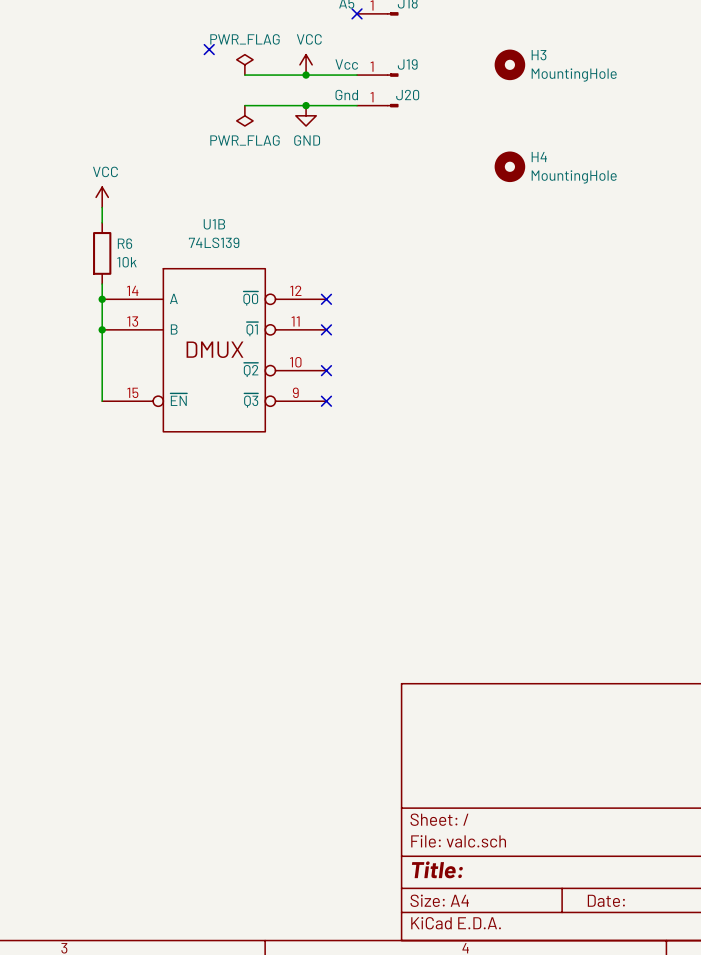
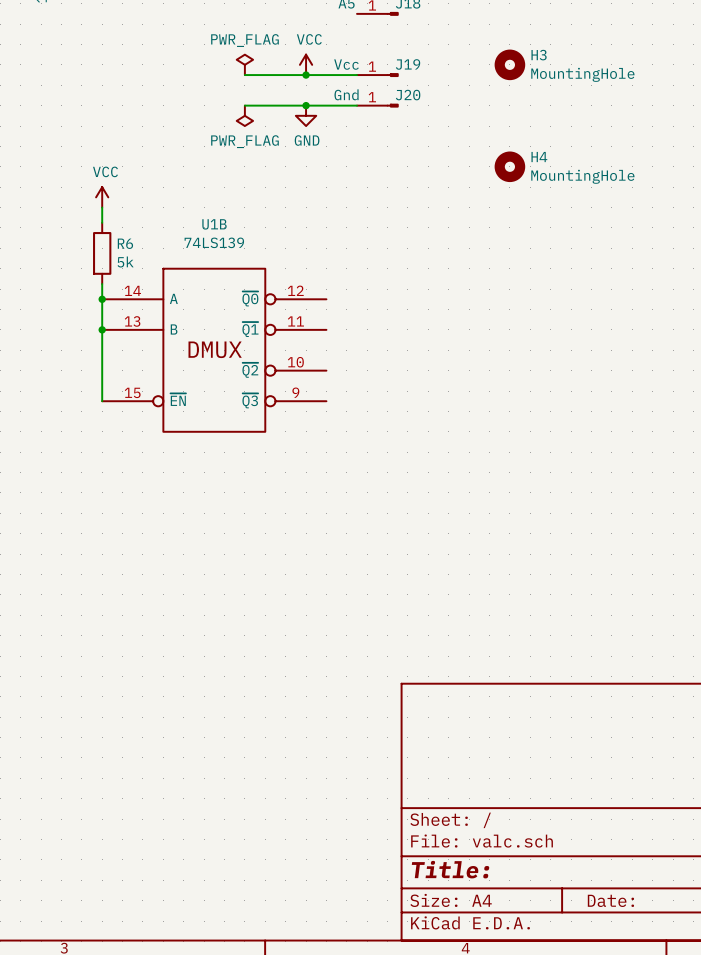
no-connect mark: (357, 13) -> none
no-connect mark: (209, 49) -> none
R6 value: 10k (126, 262) -> 5k (125, 262)
no-connect mark: (326, 299) -> none
no-connect mark: (326, 329) -> none
no-connect mark: (326, 370) -> none
no-connect mark: (326, 401) -> none

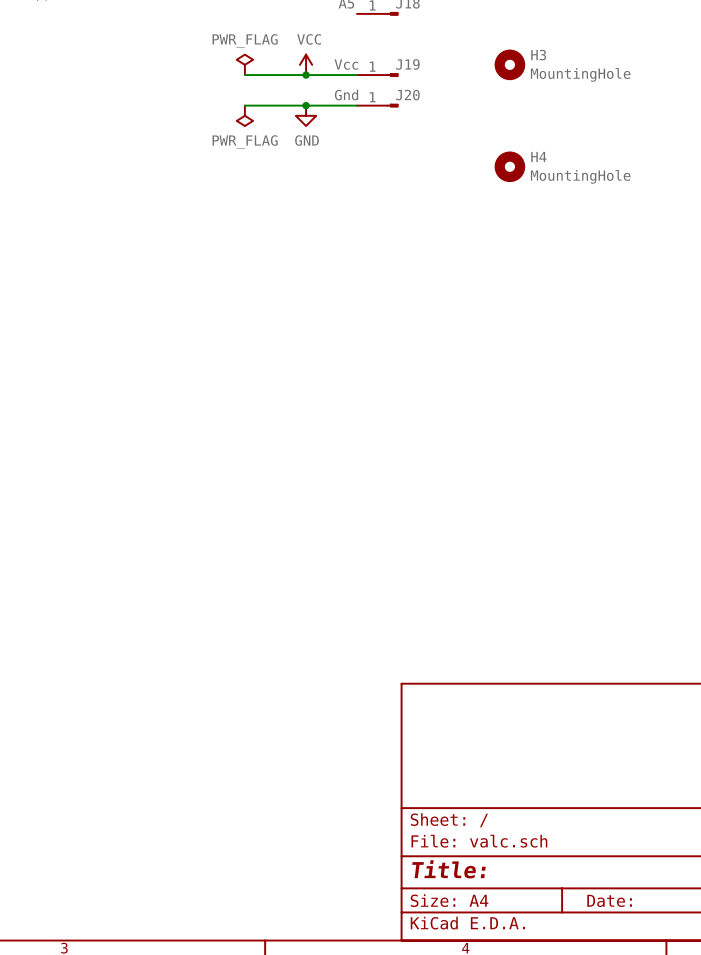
power symbol: VCC (102, 197) -> none
wire: (102, 207) (102, 222) -> none
R6: 5k (102, 253) -> none
wire: (102, 284) (102, 401) -> none
junction: (102, 299) -> none
junction: (102, 329) -> none
U1B: 74LS139 (214, 350) -> none

